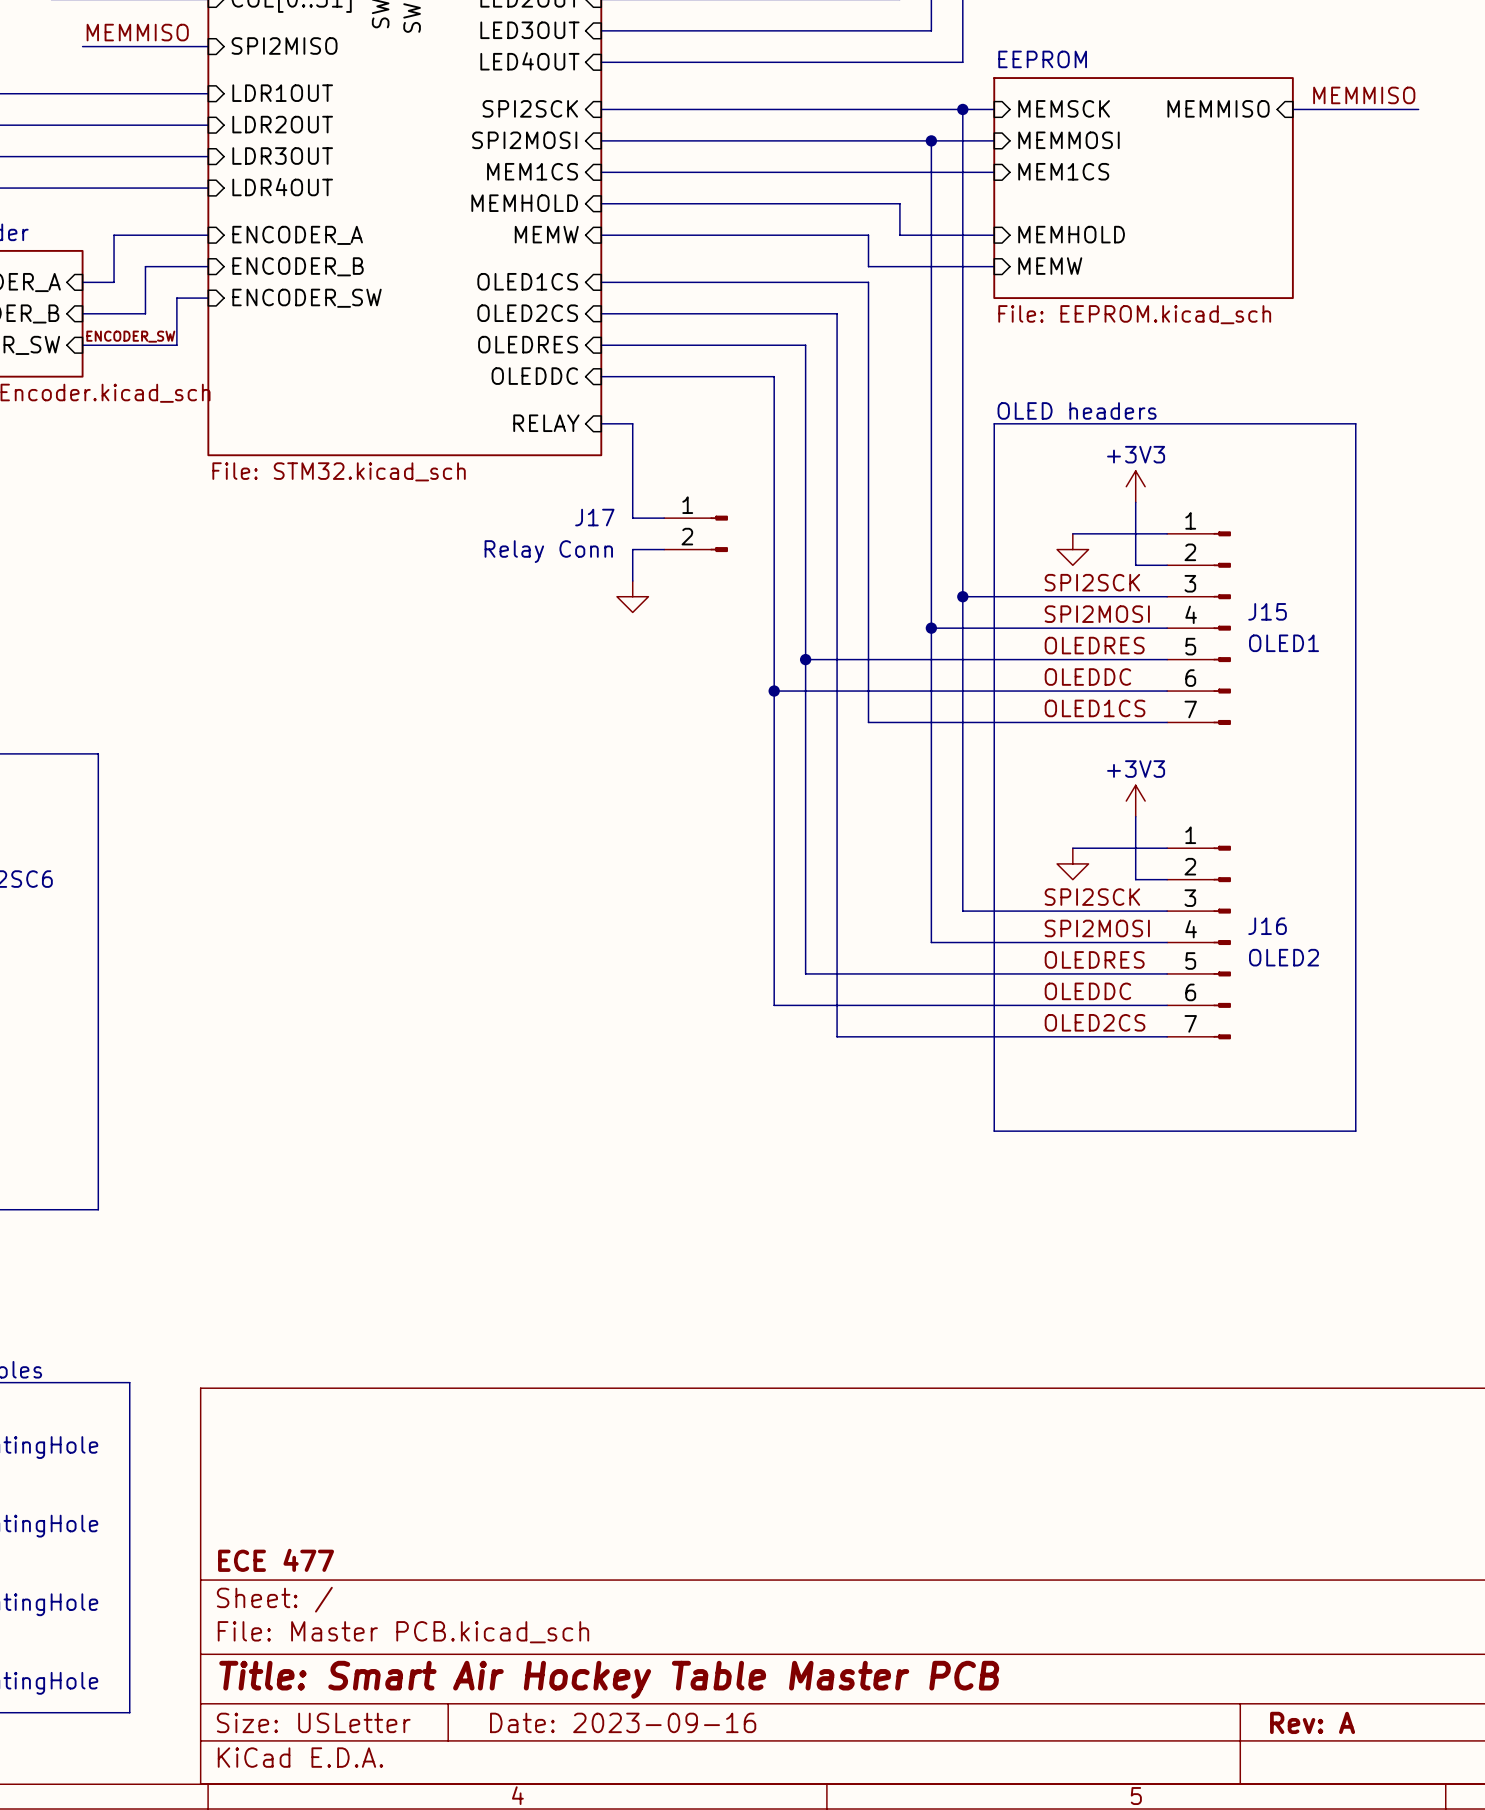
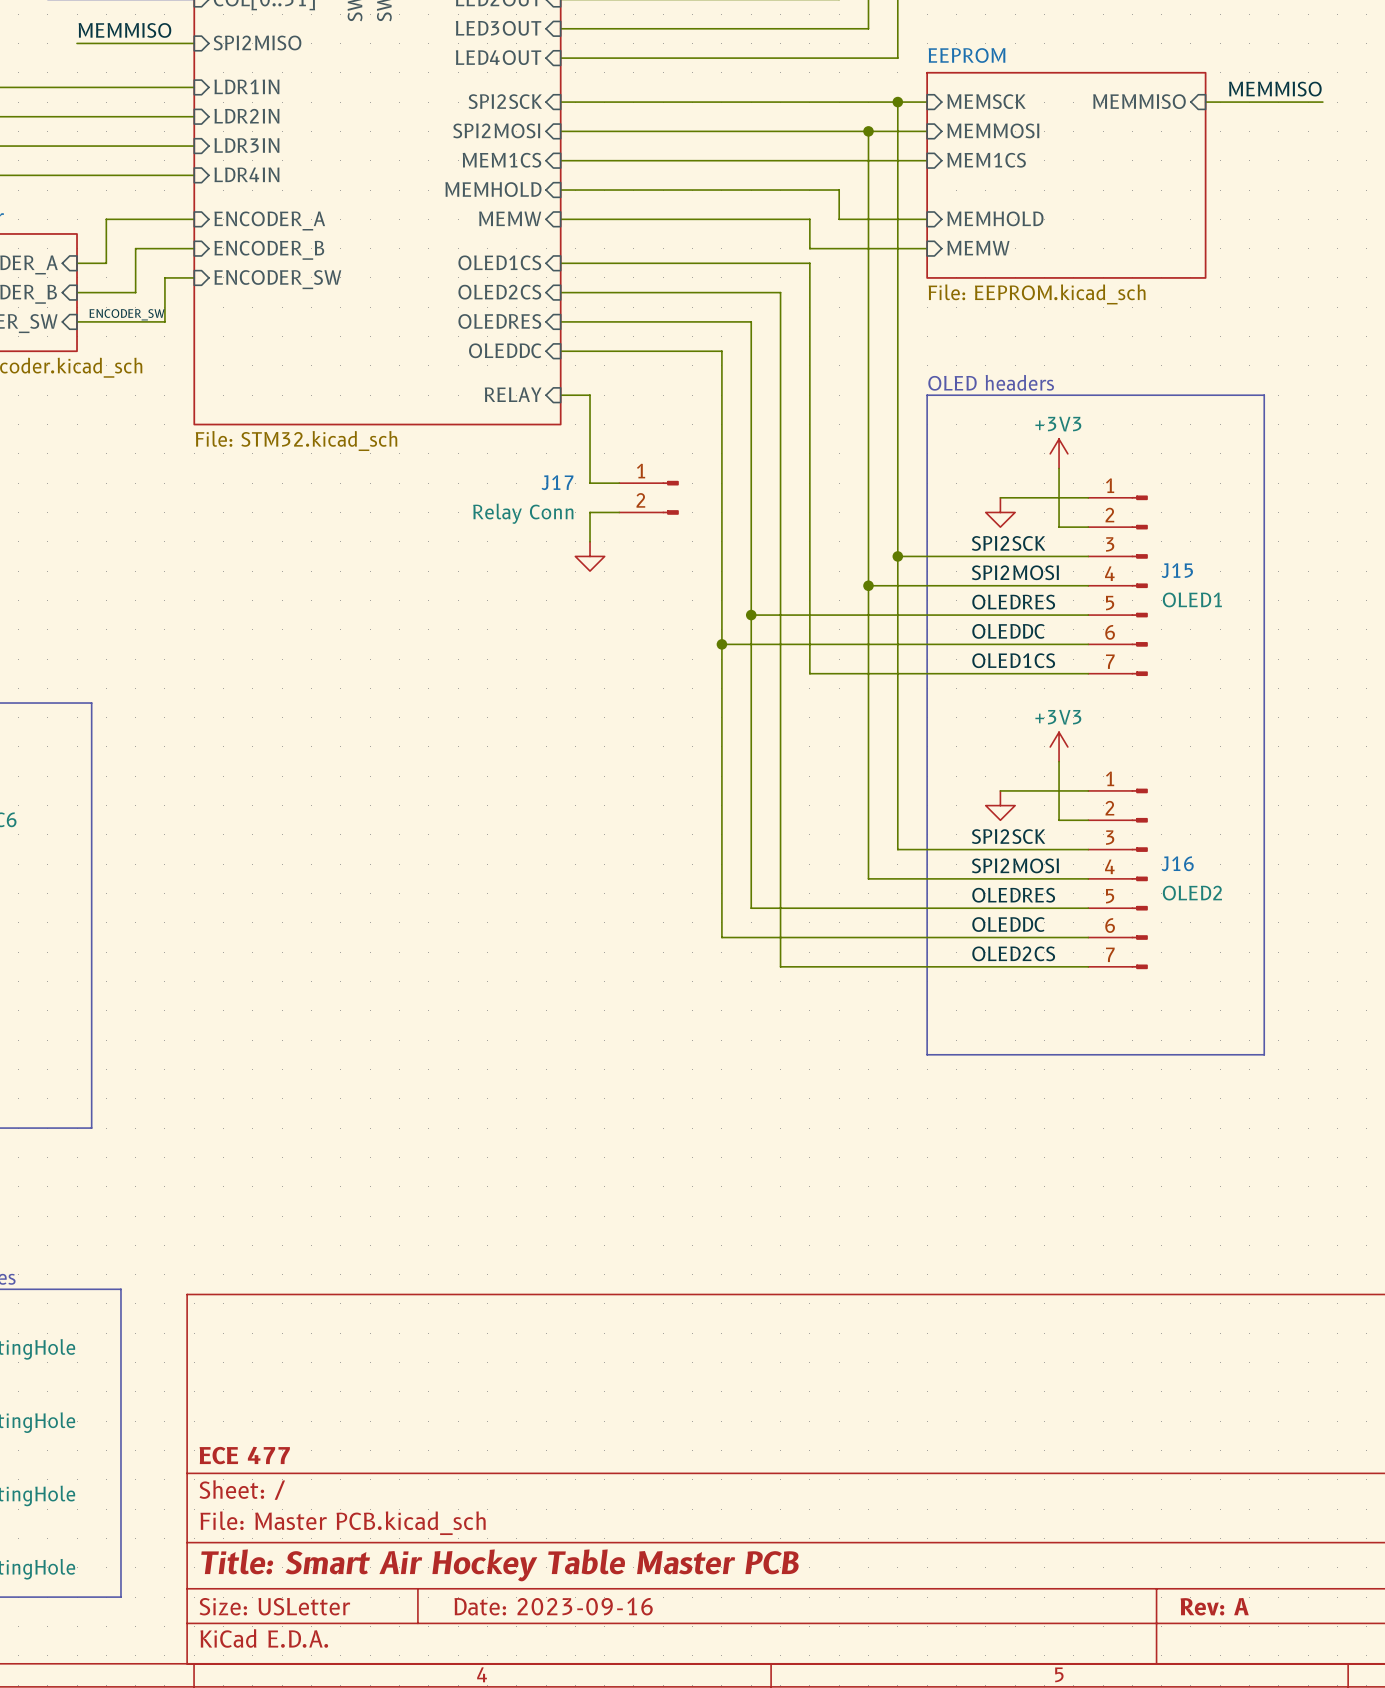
sheet pin: LDR1OUT (282, 93) -> LDR1IN (246, 86)
sheet pin: LDR2OUT (282, 124) -> LDR2IN (246, 116)
sheet pin: LDR3OUT (282, 156) -> LDR3IN (246, 145)
sheet pin: LDR4OUT (282, 187) -> LDR4IN (246, 174)

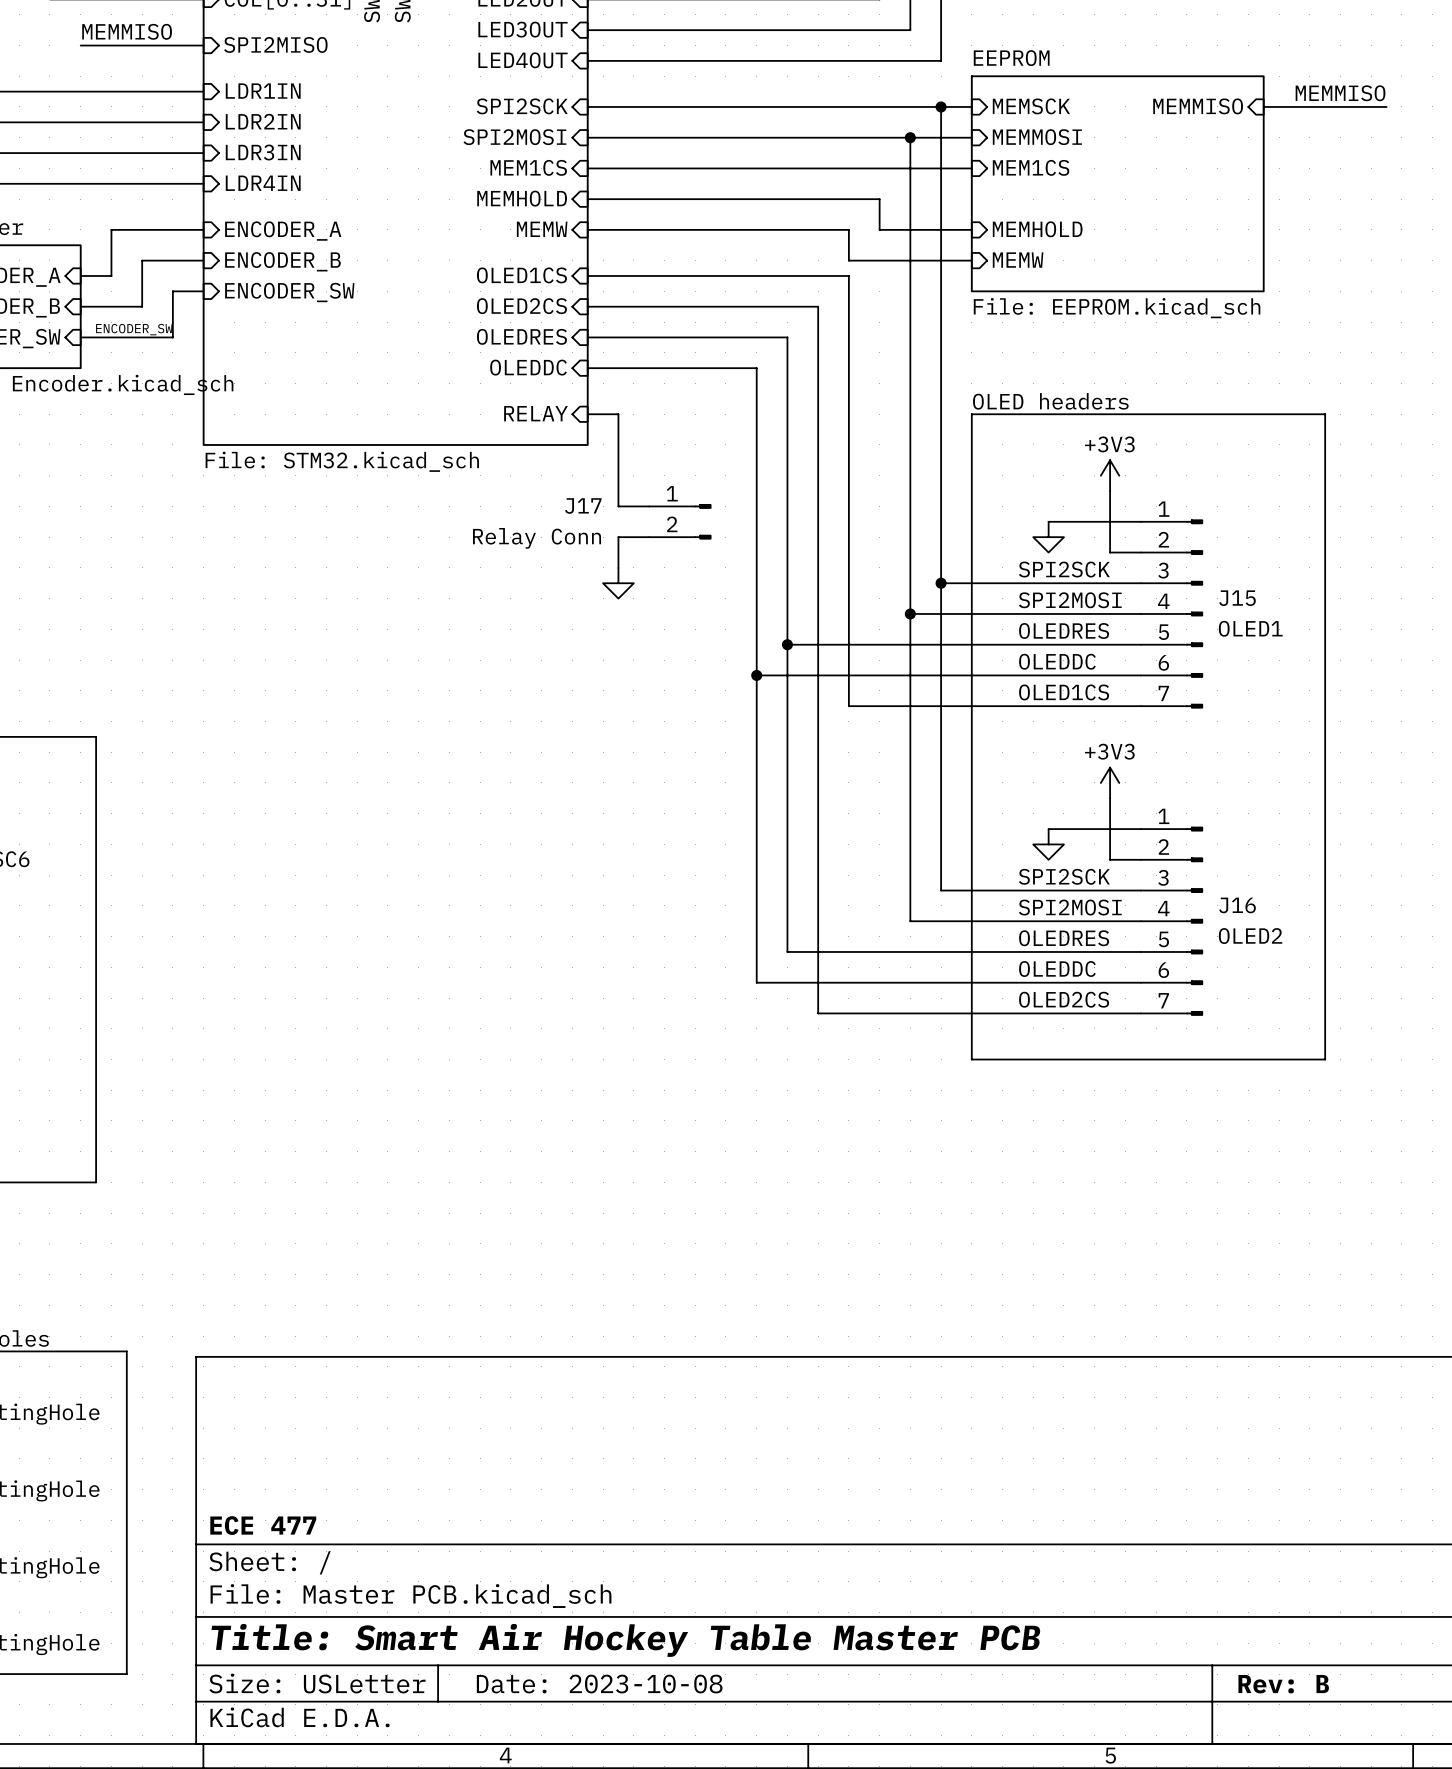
line: (927, 1010) (927, 1054) (1264, 1054) (1264, 1010) -> (971, 1059) (1325, 1059)
title block: Date: 2023-09-16 (553, 1606) -> Date: 2023-10-08 (599, 1684)
title block: Rev: A (1214, 1606) -> Rev: B (1283, 1684)

